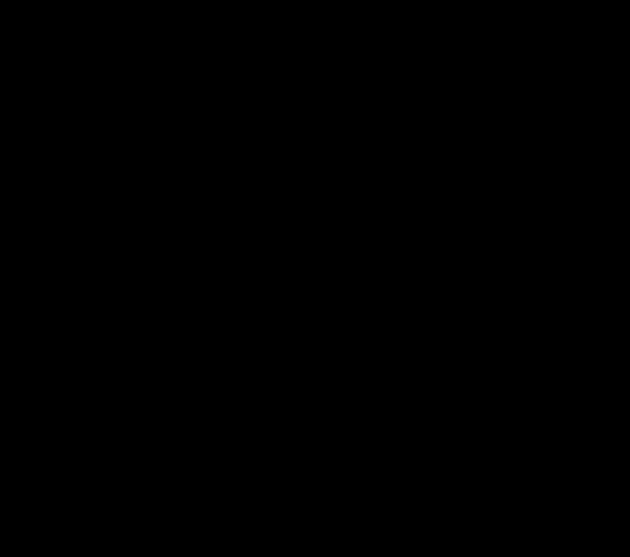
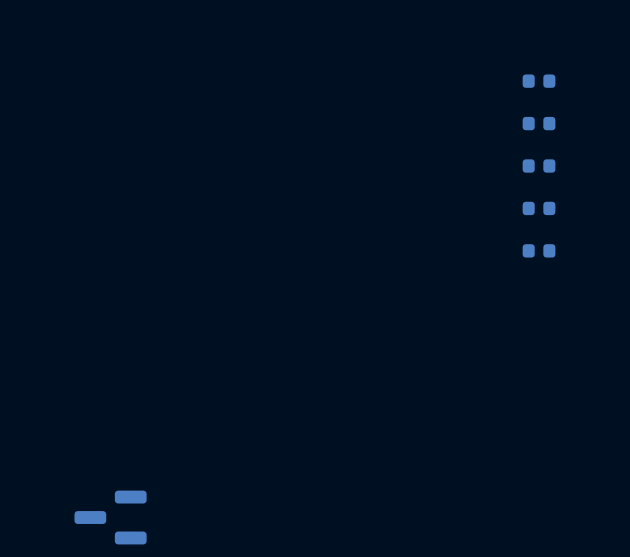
part: none -> (539, 81)
part: none -> (539, 123)
part: none -> (539, 166)
part: none -> (539, 208)
part: none -> (539, 250)
part: none -> (110, 517)

